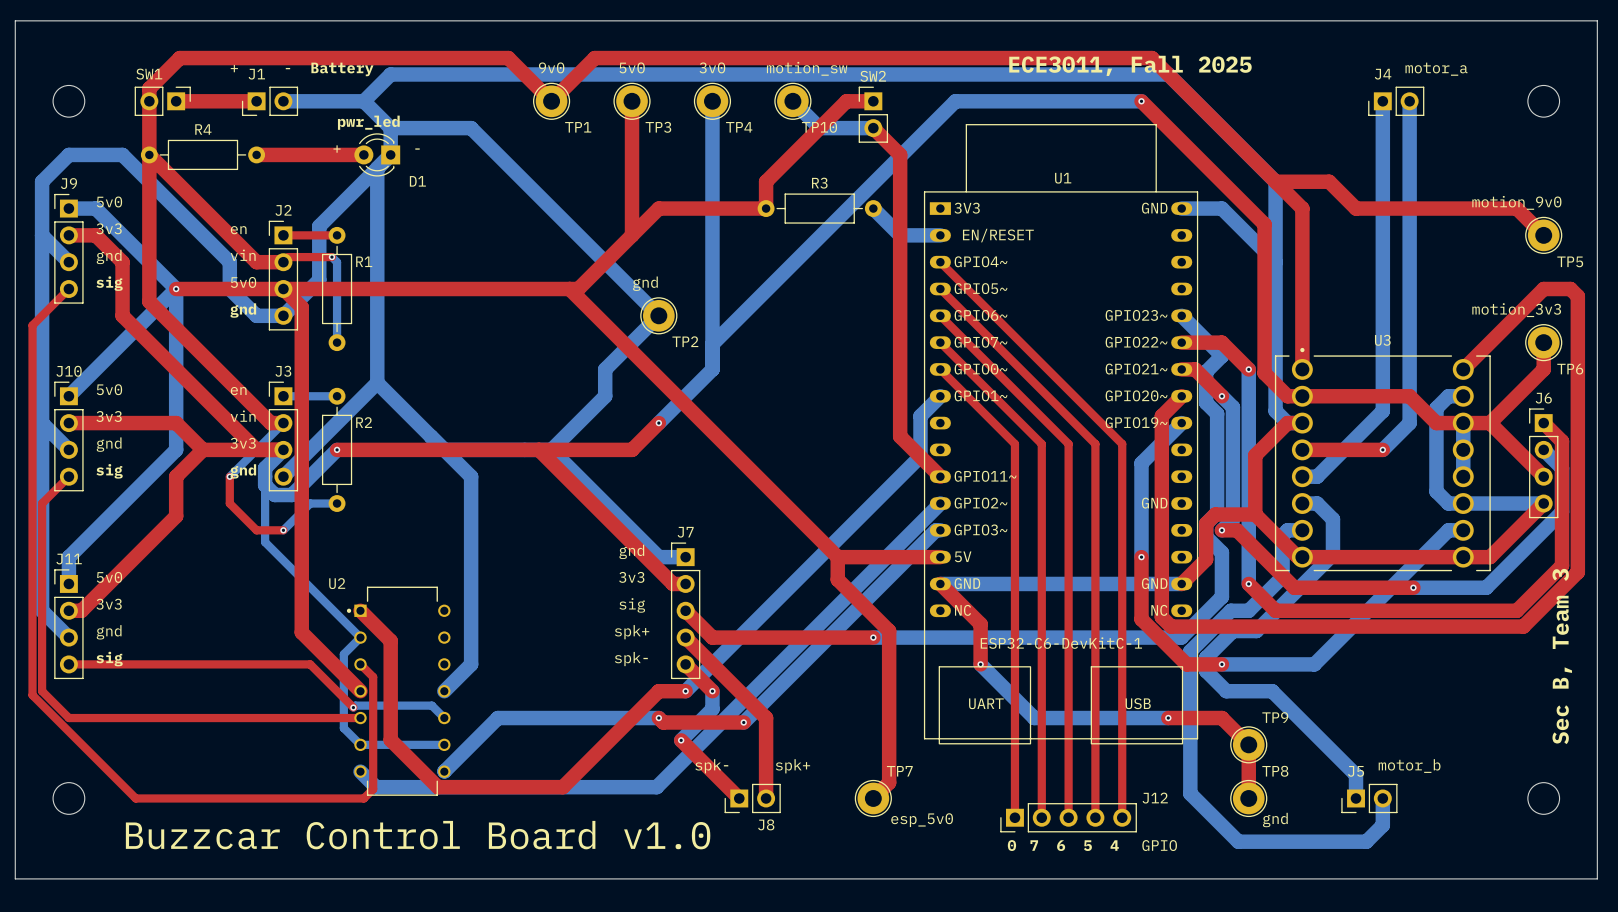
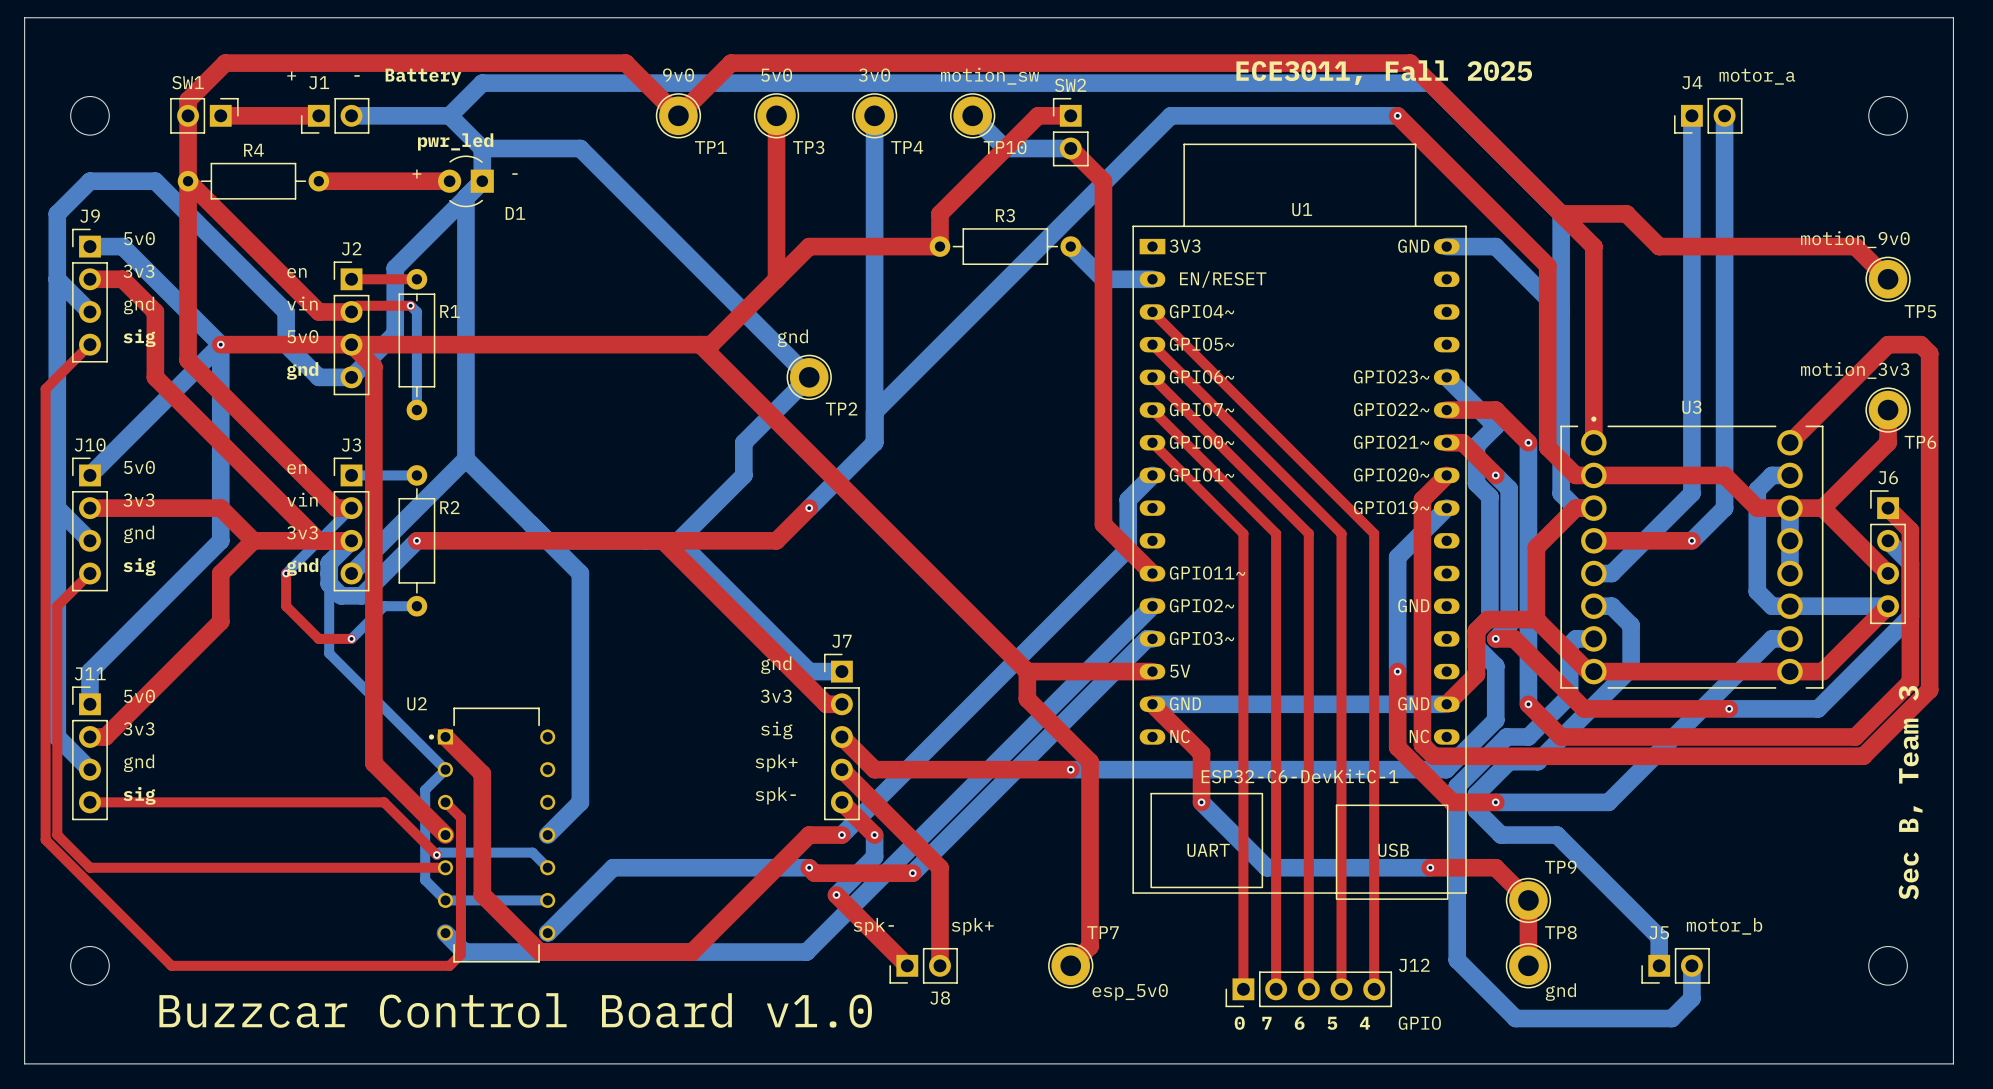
U1 footprint: [923, 124, 1199, 745] -> [1132, 143, 1467, 900]
D1 footprint: [354, 133, 401, 177] -> [438, 155, 494, 208]
R1 footprint: [321, 226, 353, 352] -> [398, 268, 436, 421]

